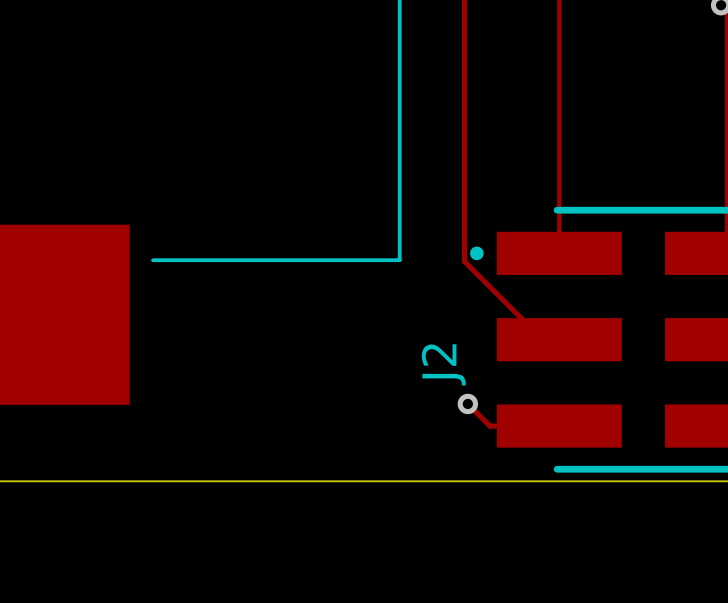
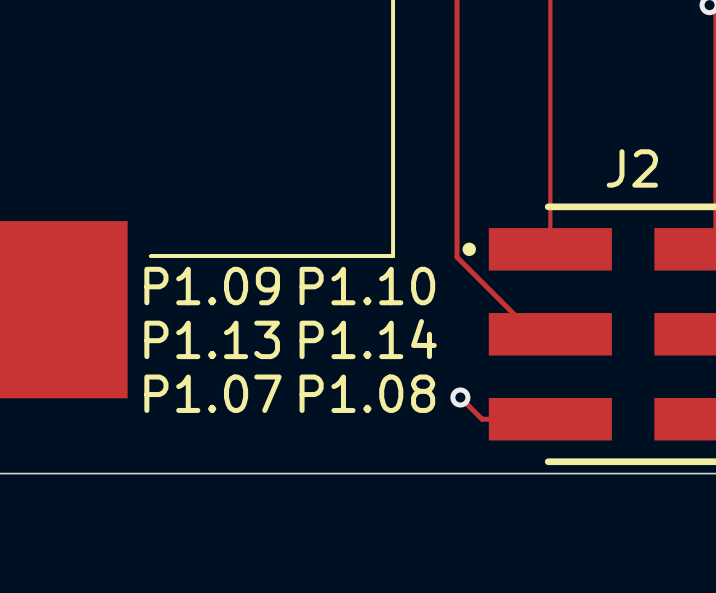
text: none -> P1.09 (212, 286)
text: none -> P1.10 (367, 286)
text: none -> P1.13 (212, 339)
text: none -> P1.14 (368, 339)
J2 name rotation: 0° (443, 364) -> 90° clockwise (632, 168)
J2 name position: J2 (443, 364) -> J2 (632, 168)
text: none -> P1.07 (212, 393)
text: none -> P1.08 (367, 393)

